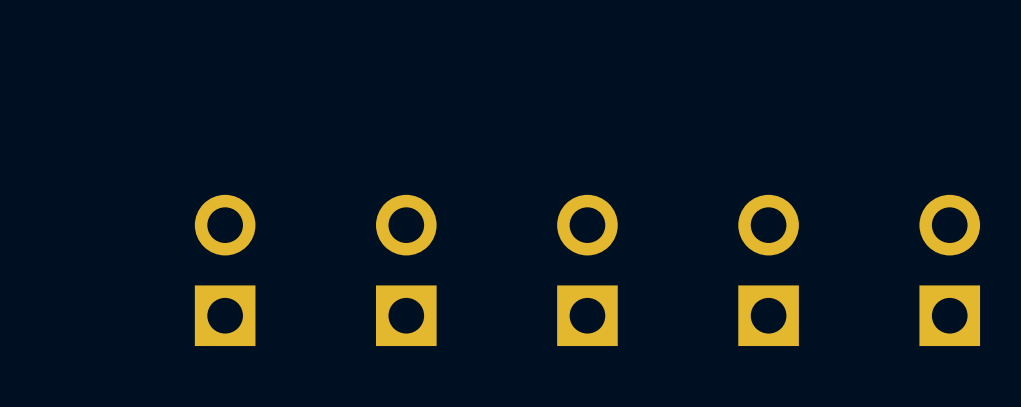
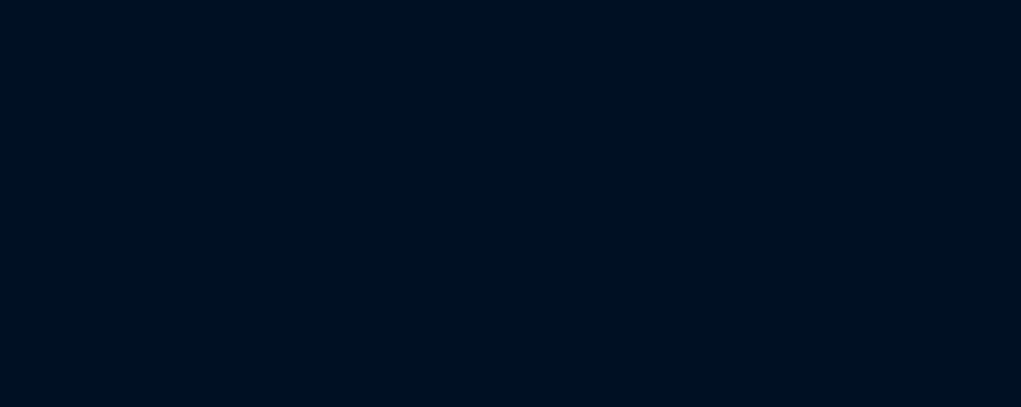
part: (225, 270) -> none
part: (406, 270) -> none
part: (587, 270) -> none
part: (768, 270) -> none
part: (949, 270) -> none

